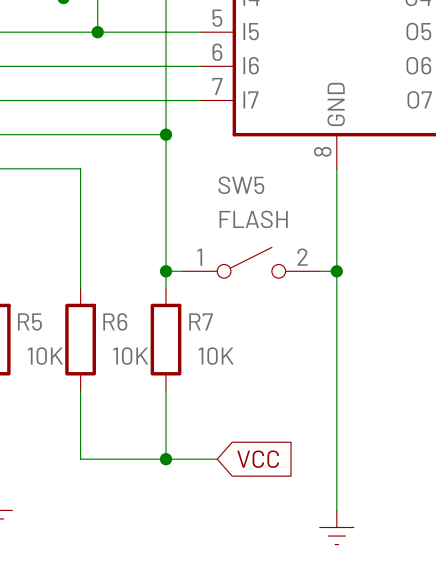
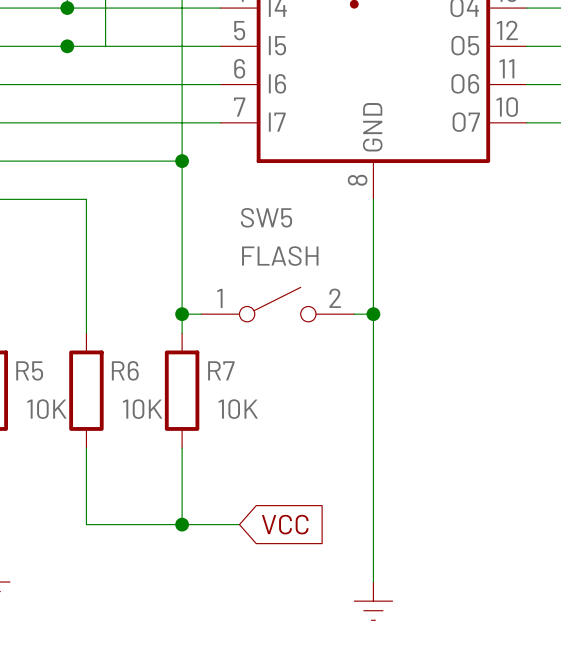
junction position: (97, 32) -> (67, 46)

